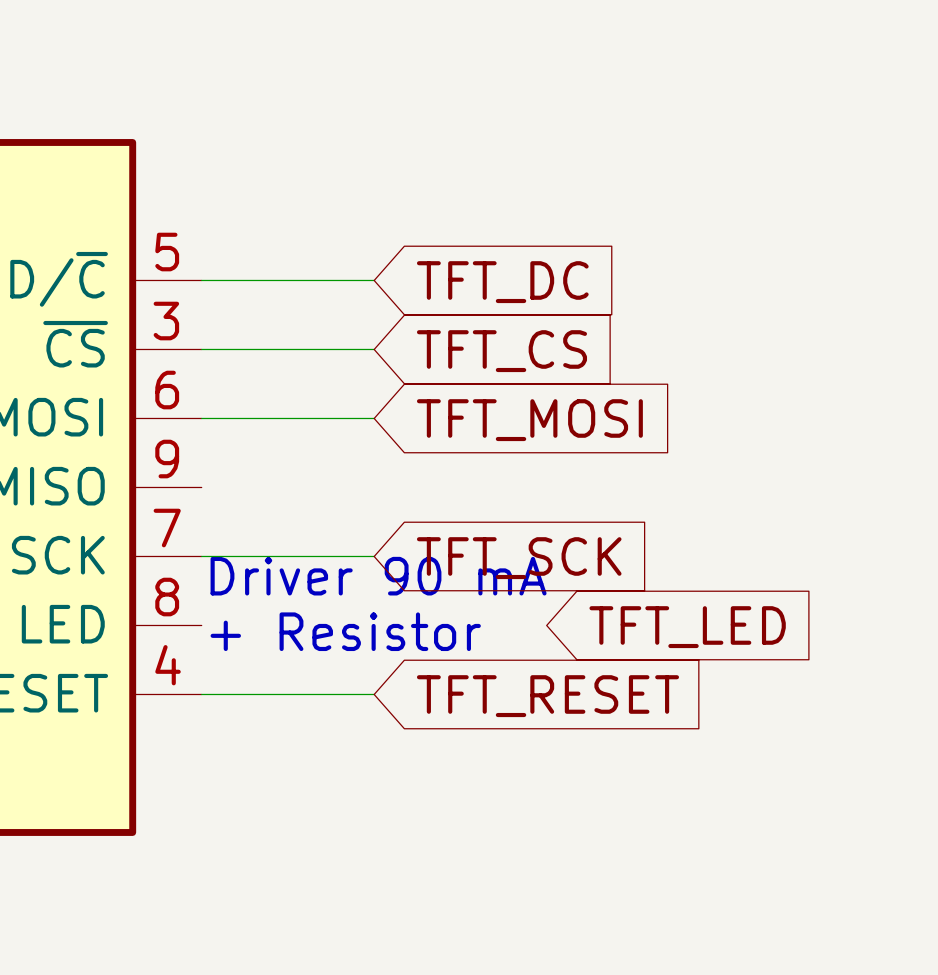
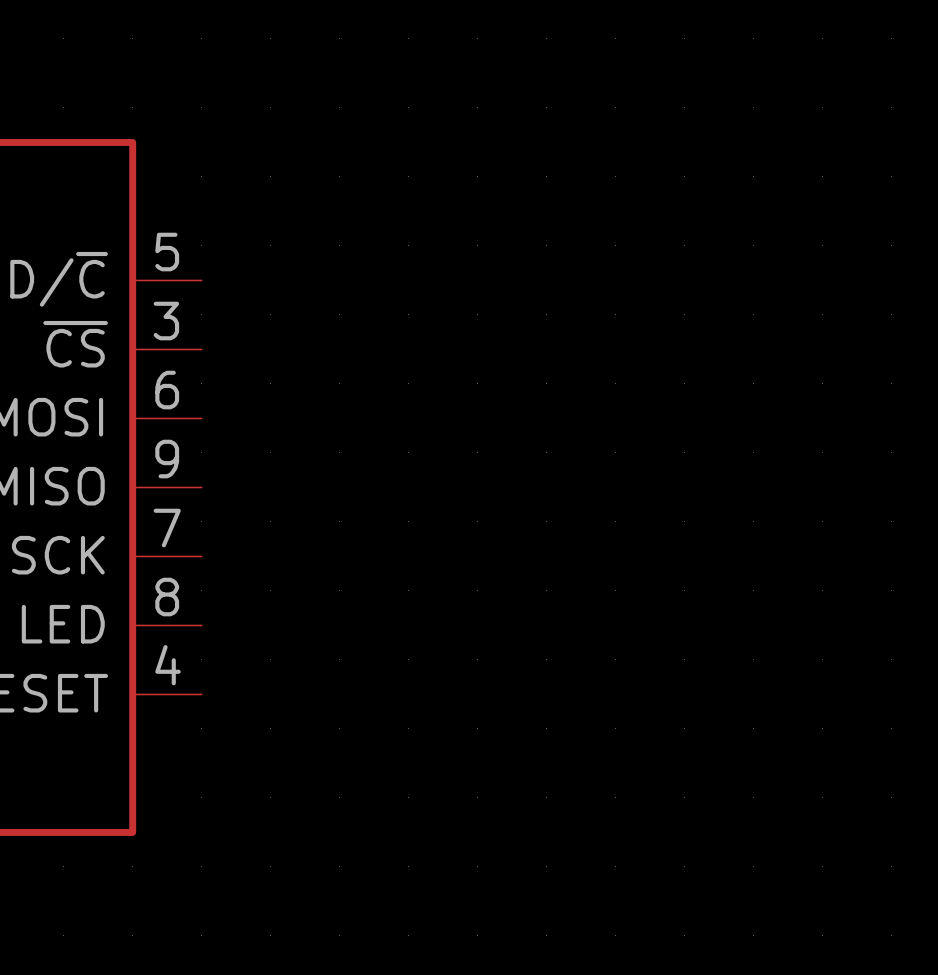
wire: (201, 280) (374, 280) -> none
global label: TFT_DC (502, 282) -> none
wire: (201, 349) (374, 349) -> none
global label: TFT_CS (501, 351) -> none
wire: (201, 418) (374, 418) -> none
global label: TFT_MOSI (529, 420) -> none
wire: (201, 556) (374, 556) -> none
global label: TFT_SCK (519, 558) -> none
text: Driver 90 mA (378, 576) -> none
global label: TFT_LED (687, 627) -> none
text: + Resistor (345, 631) -> none
wire: (201, 694) (374, 694) -> none
global label: TFT_RESET (547, 696) -> none

